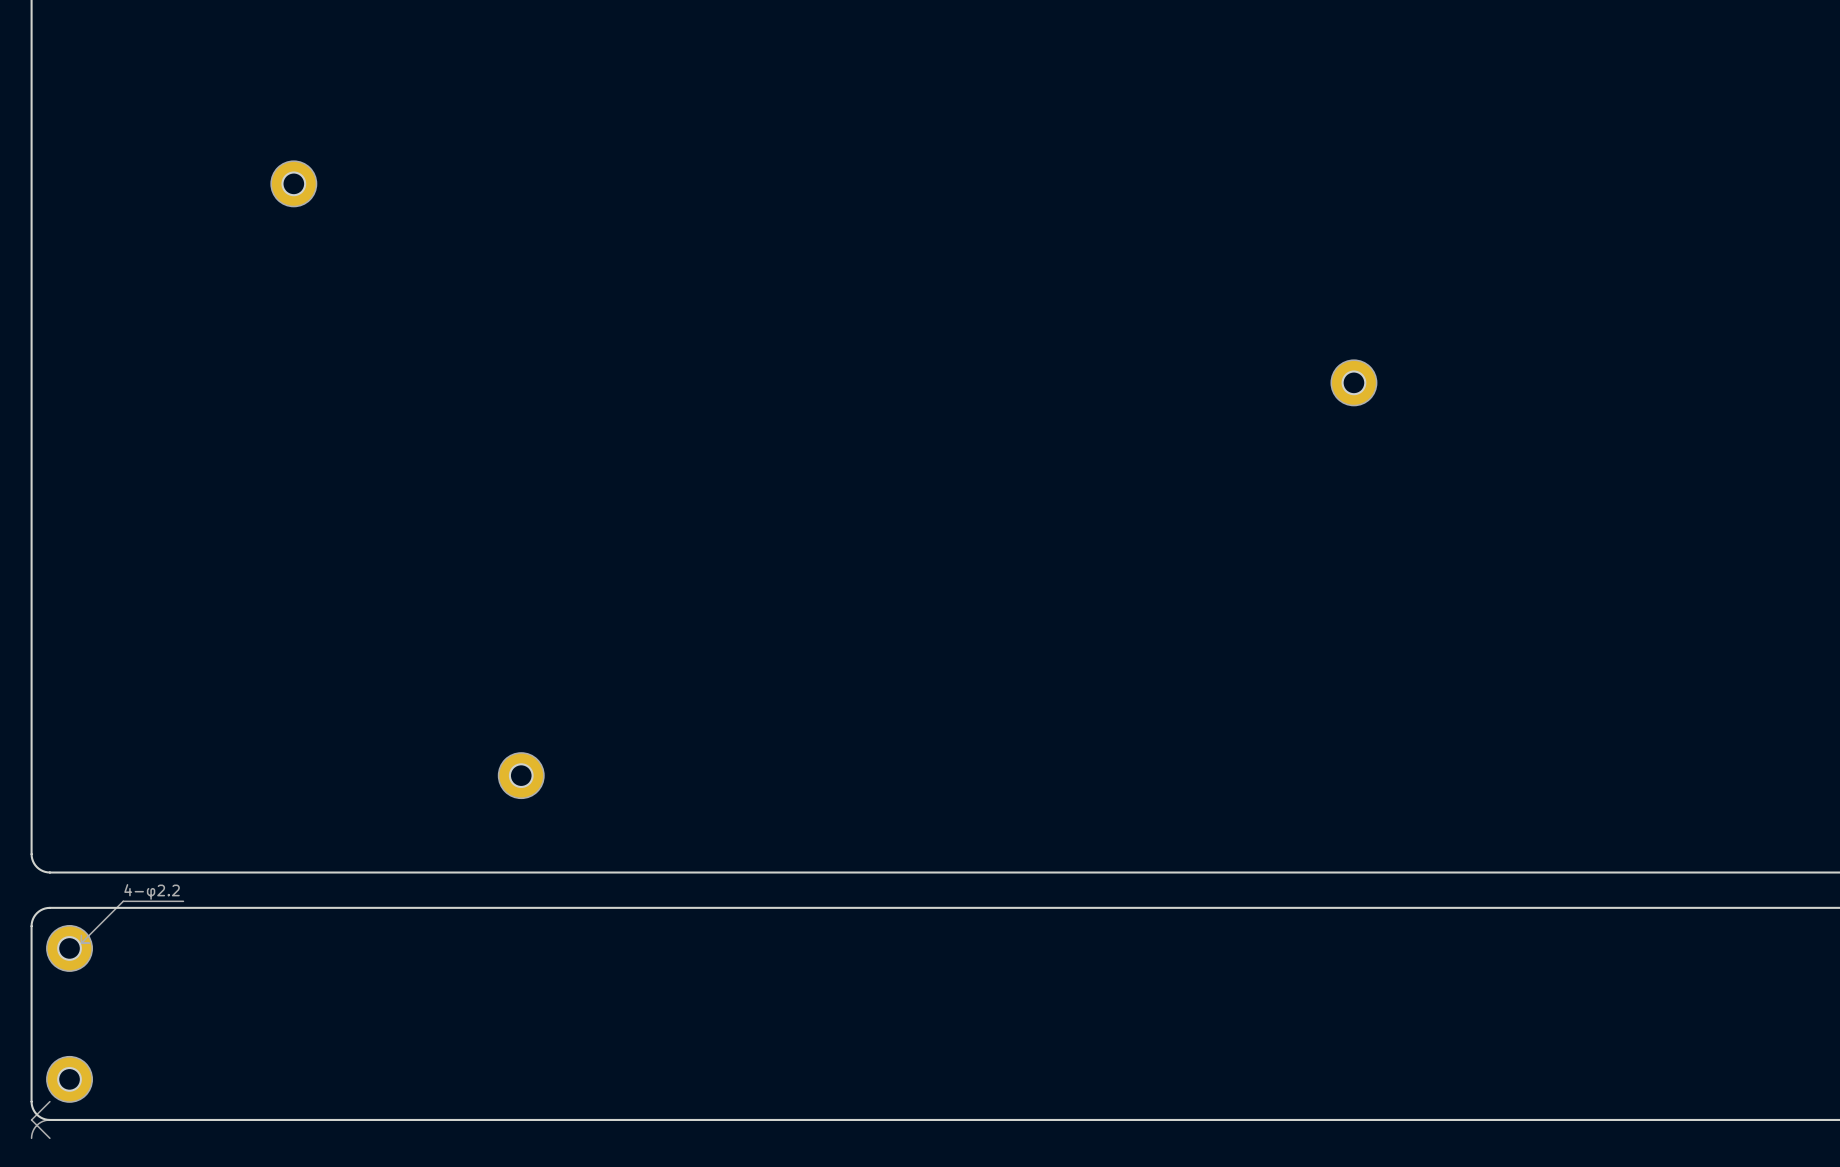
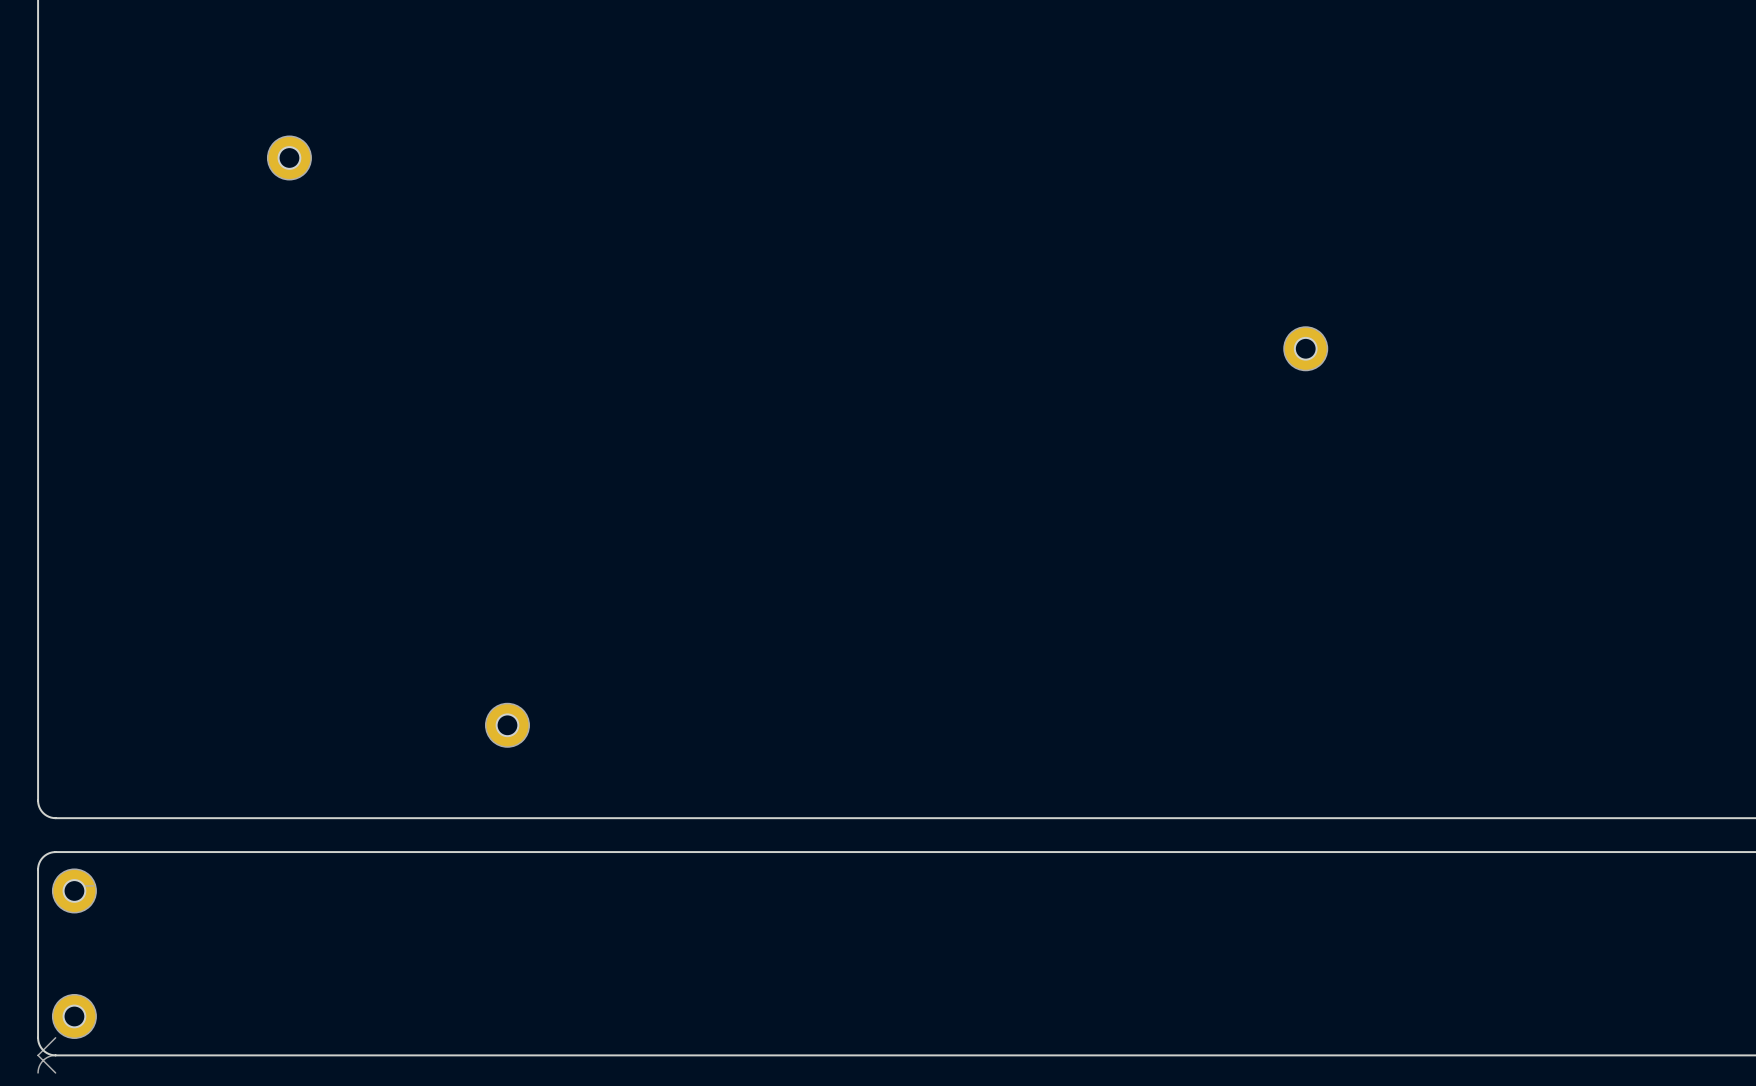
text: 4-φ2.2 (152, 891) -> none
line: (183, 901) (123, 901) (81, 943) (81, 935) -> none

